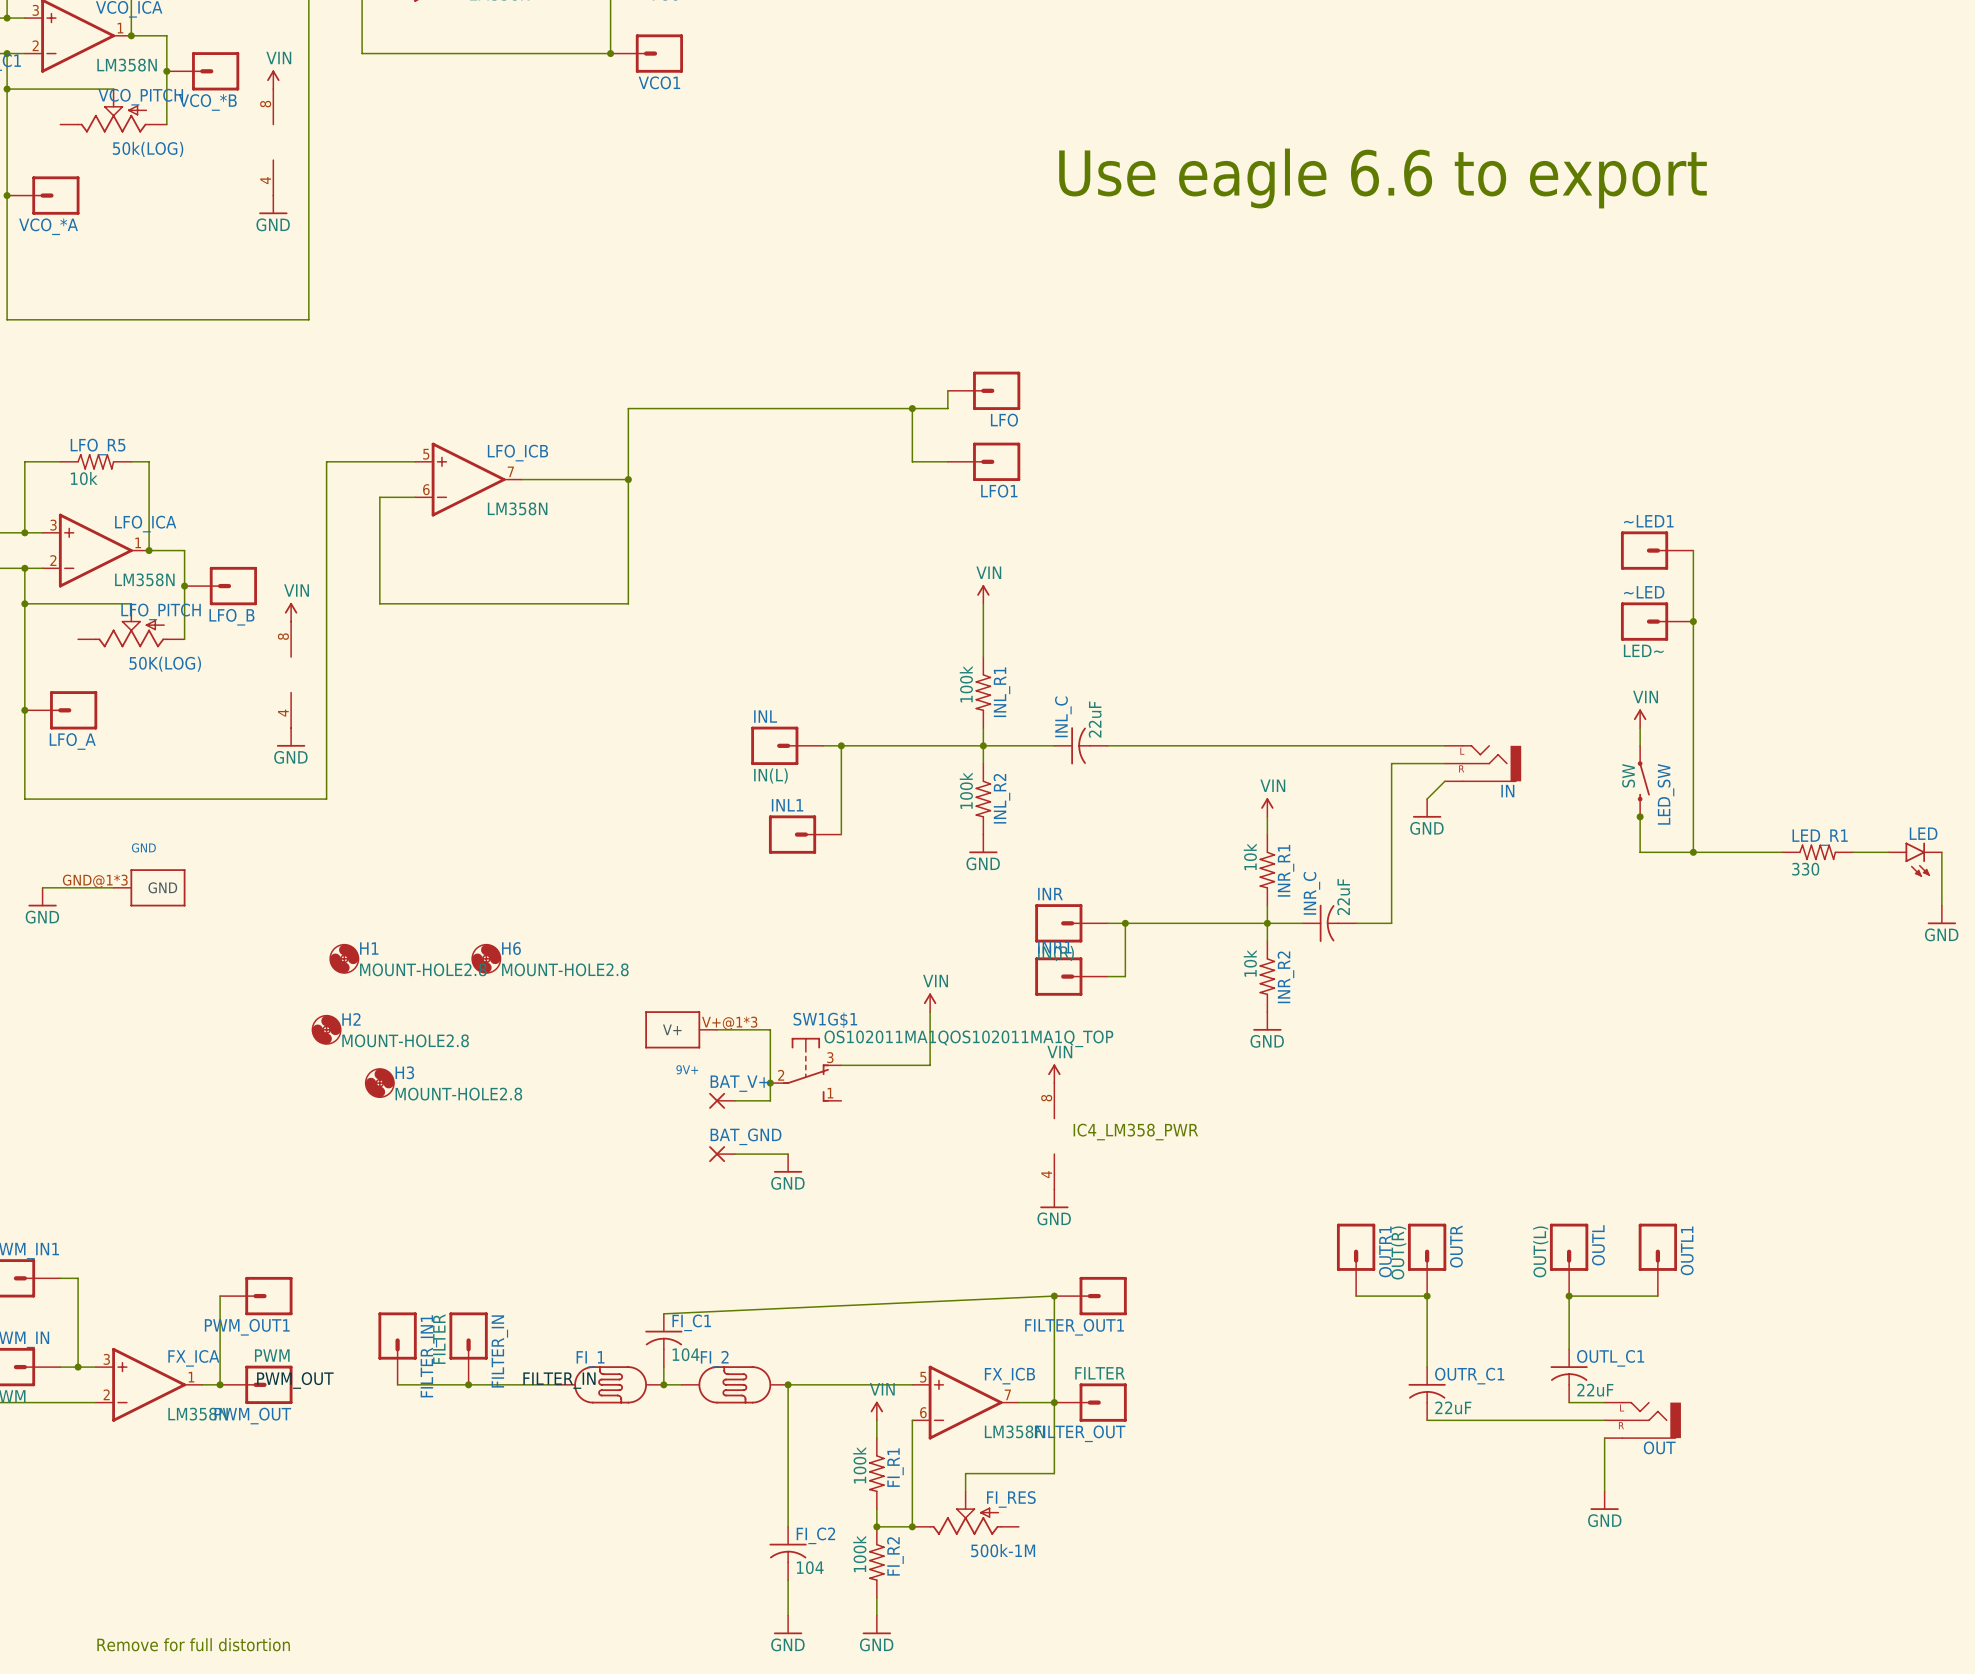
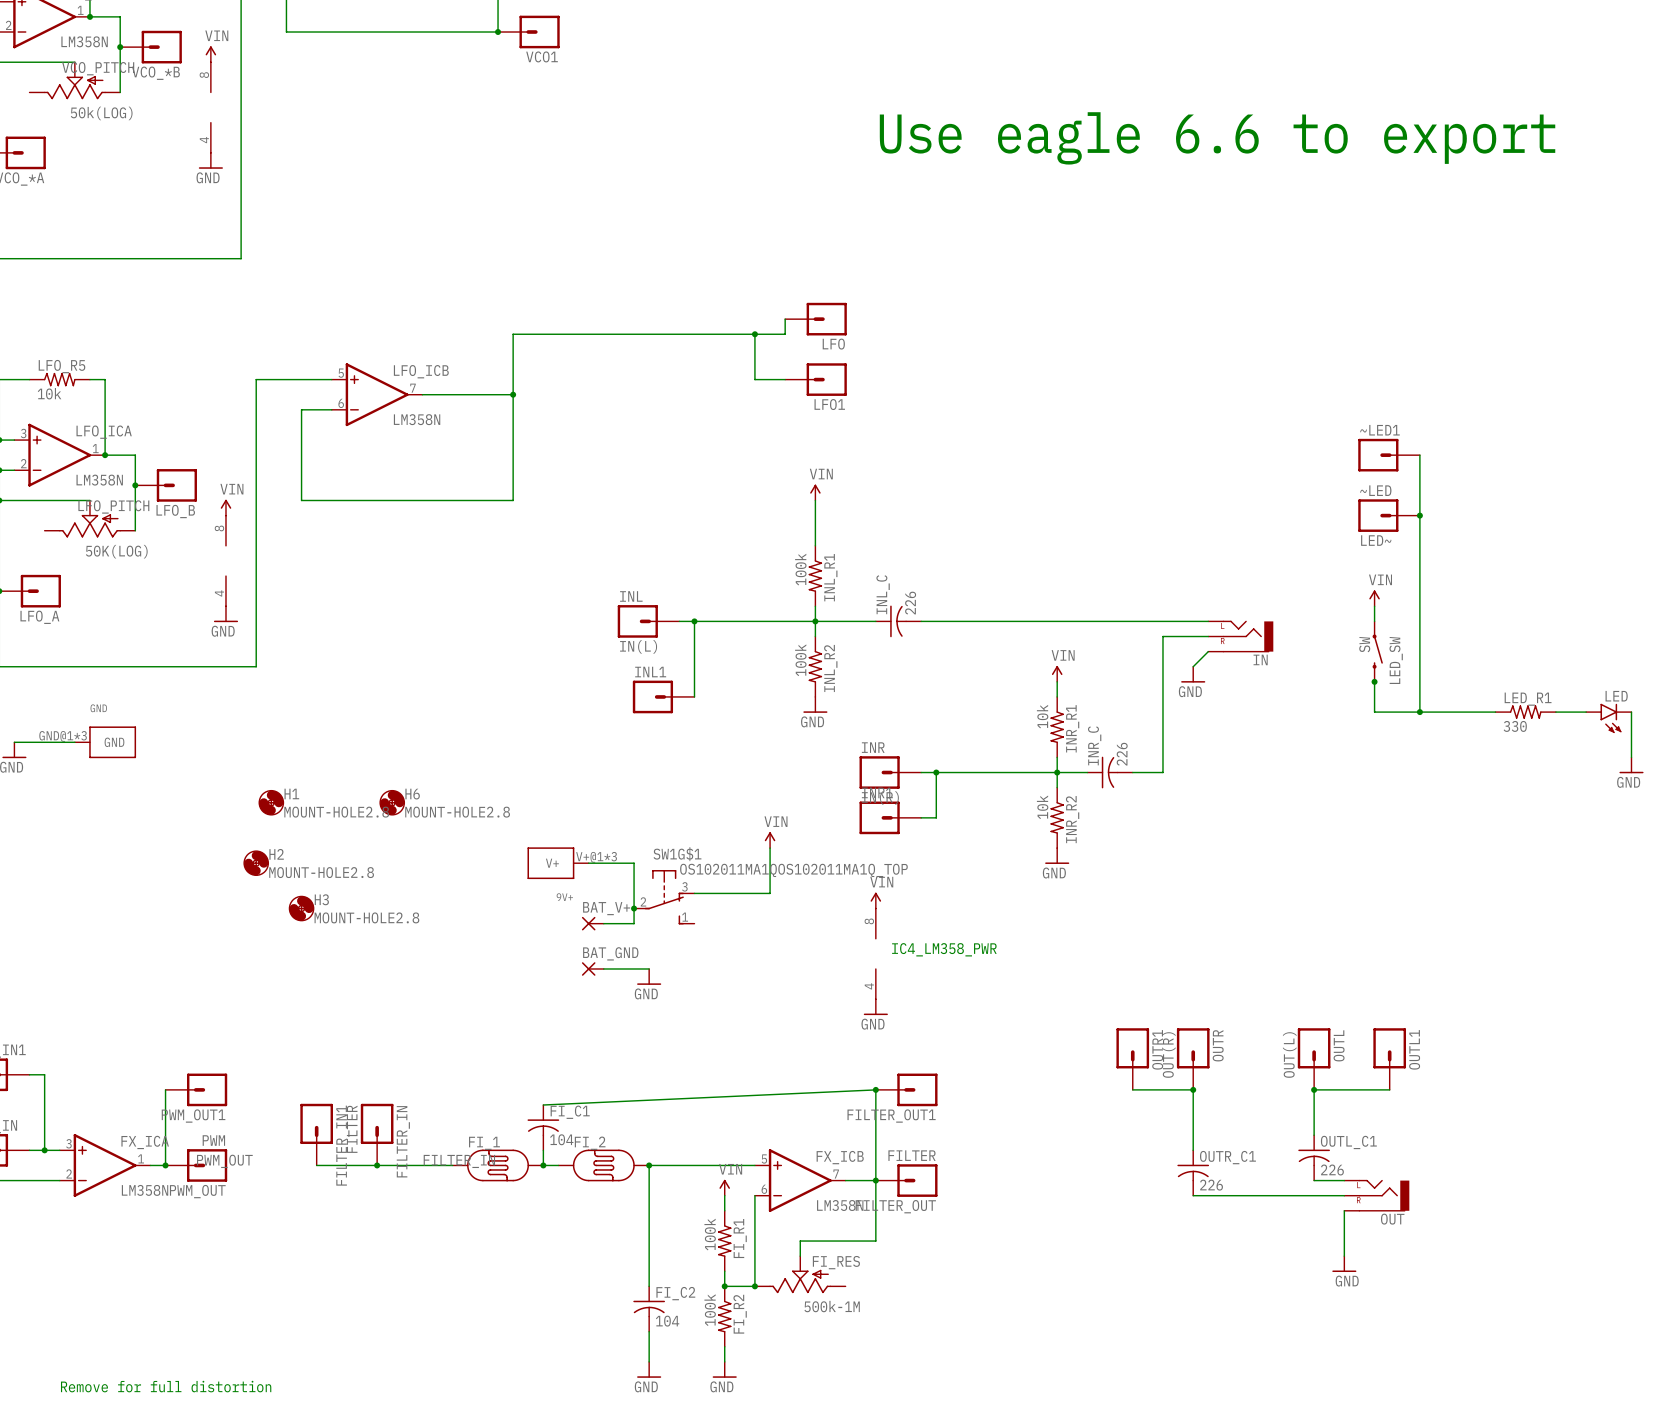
INL_C value: 22uF (1095, 719) -> 226 (910, 603)
INR_C value: 22uF (1343, 897) -> 226 (1122, 754)
OUTL_C1 value: 22uF (1595, 1390) -> 226 (1332, 1169)
OUTR_C1 value: 22uF (1453, 1407) -> 226 (1211, 1185)

